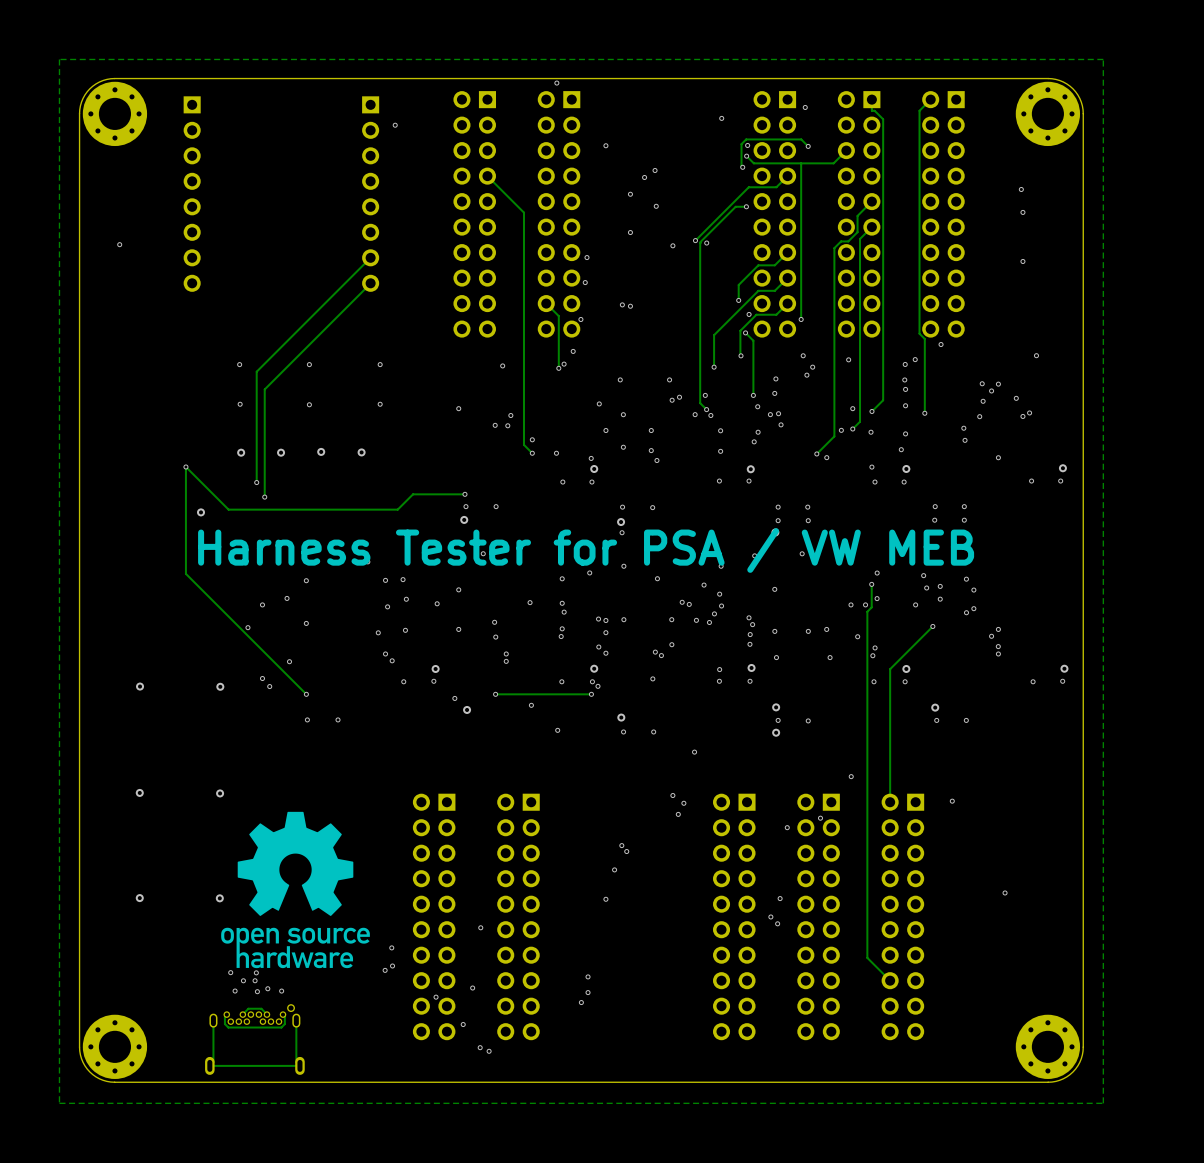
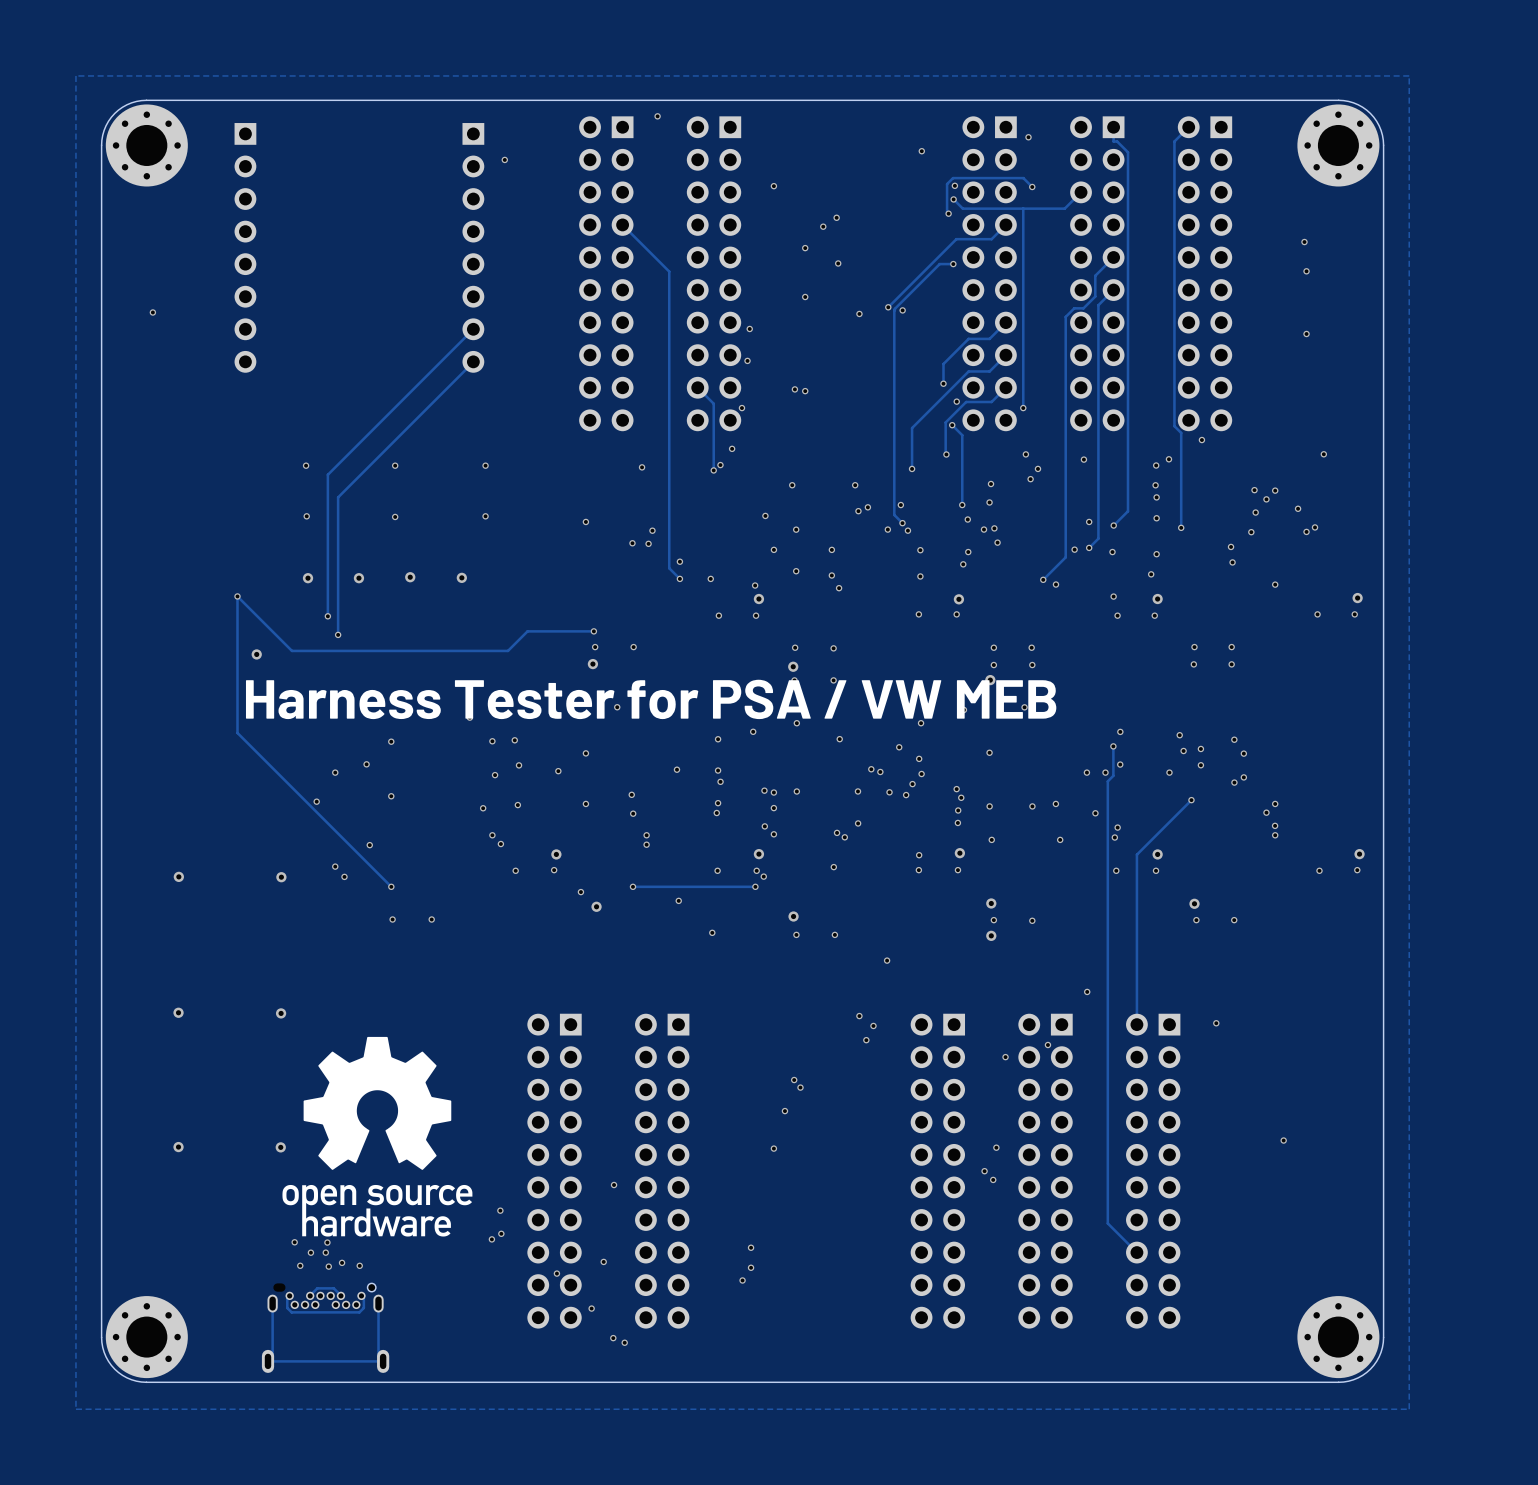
via position: (556, 83) -> (657, 116)

